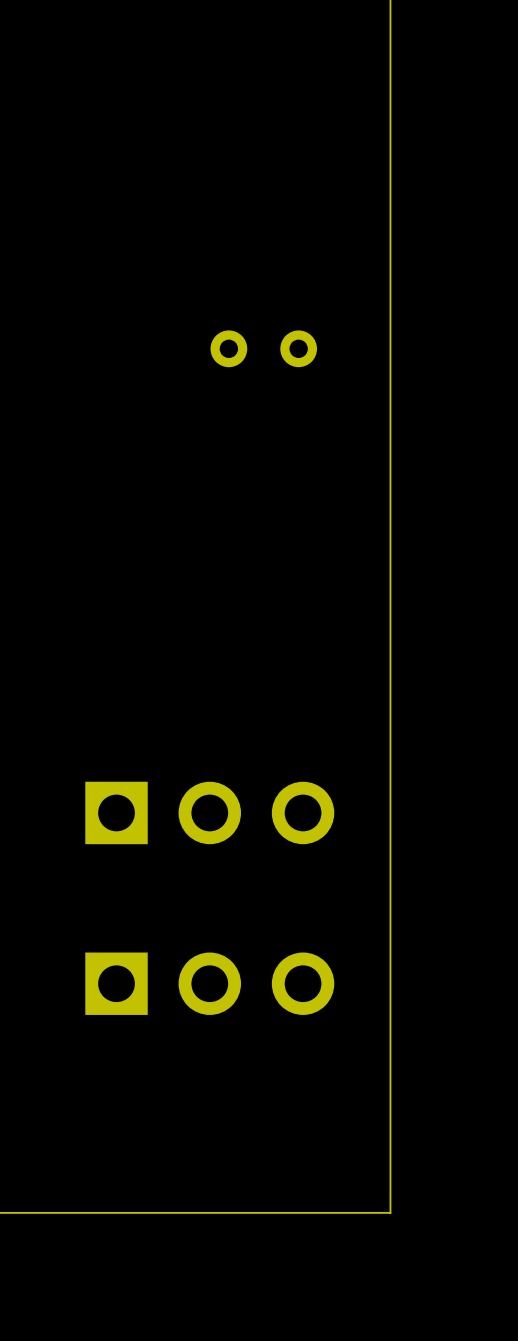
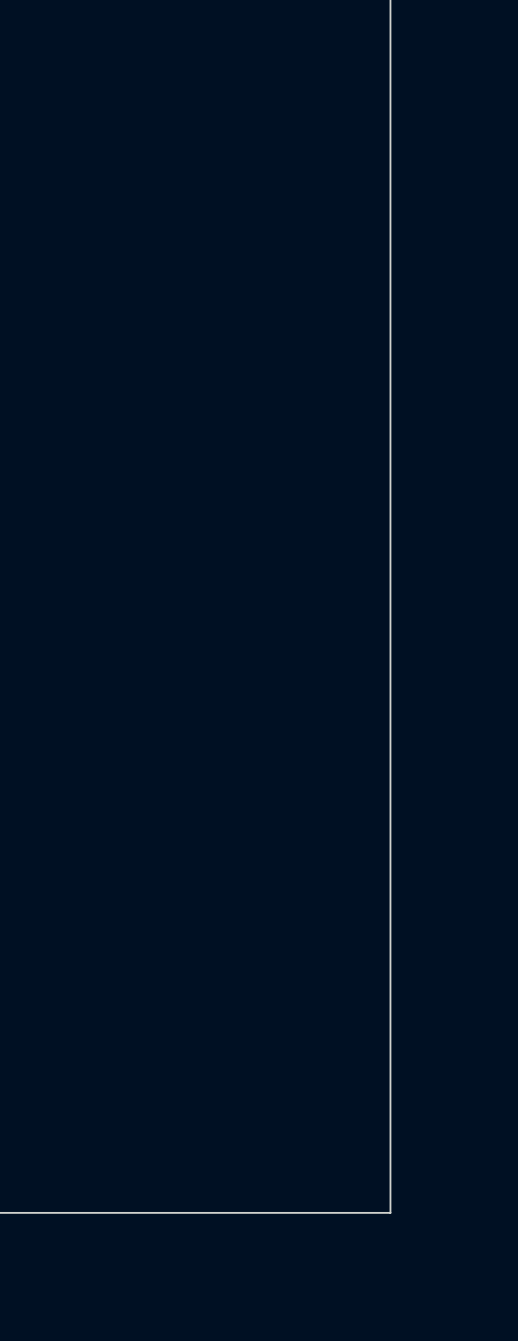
part: (263, 348) -> none
part: (209, 812) -> none
part: (209, 983) -> none

